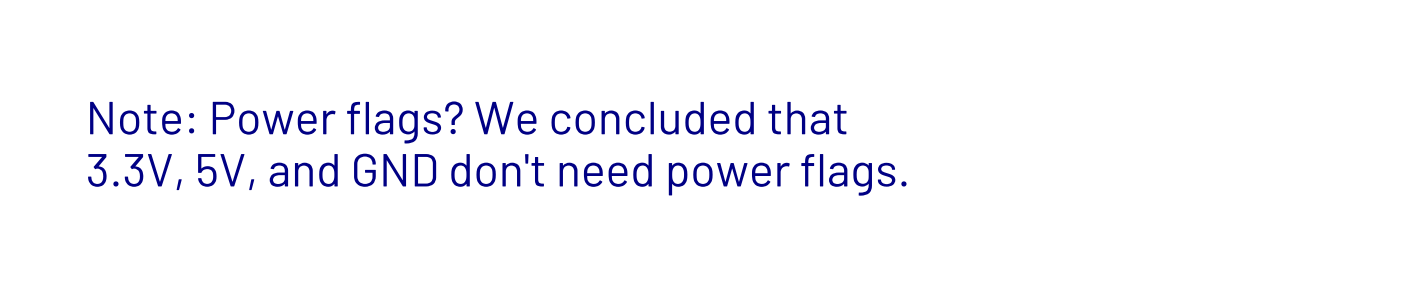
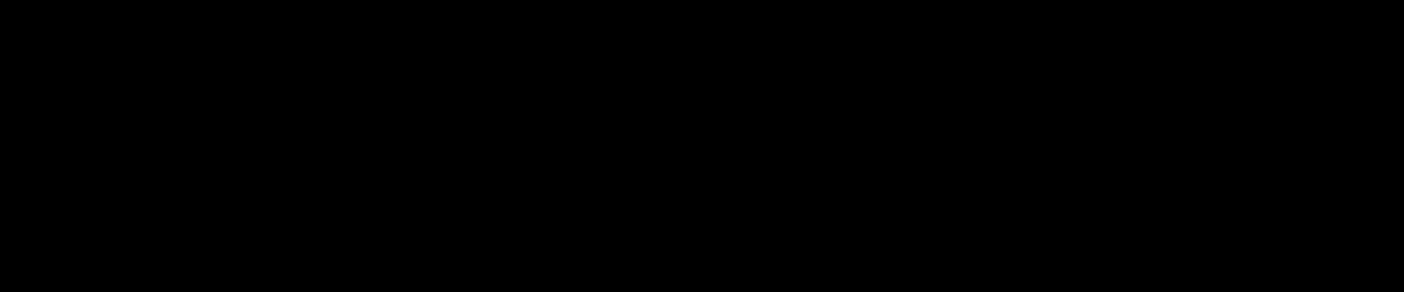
text: Note: Power flags? We concluded that (468, 122) -> none
text: 3.3V, 5V, and GND don't need power flags. (497, 174) -> none

